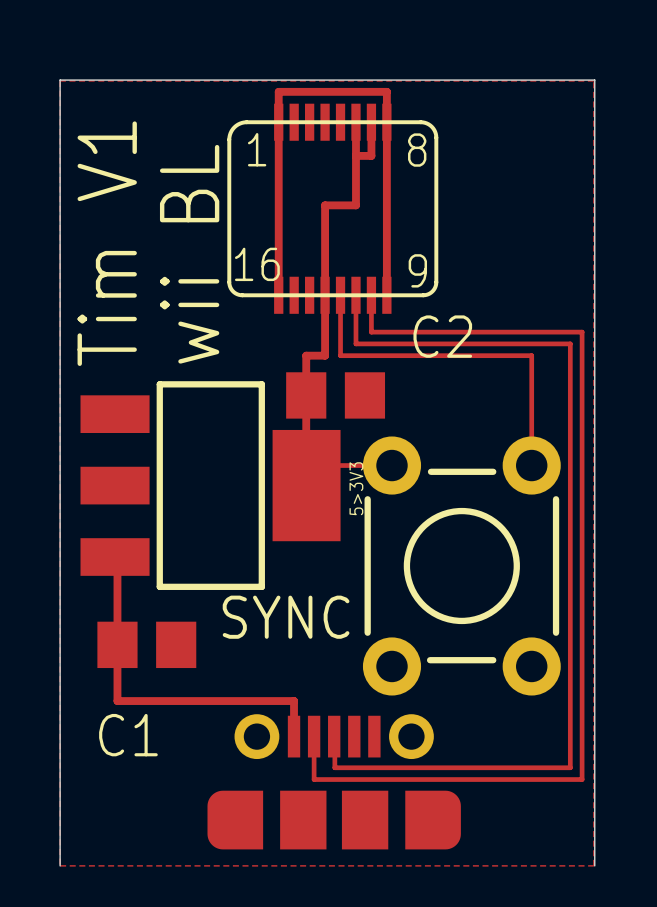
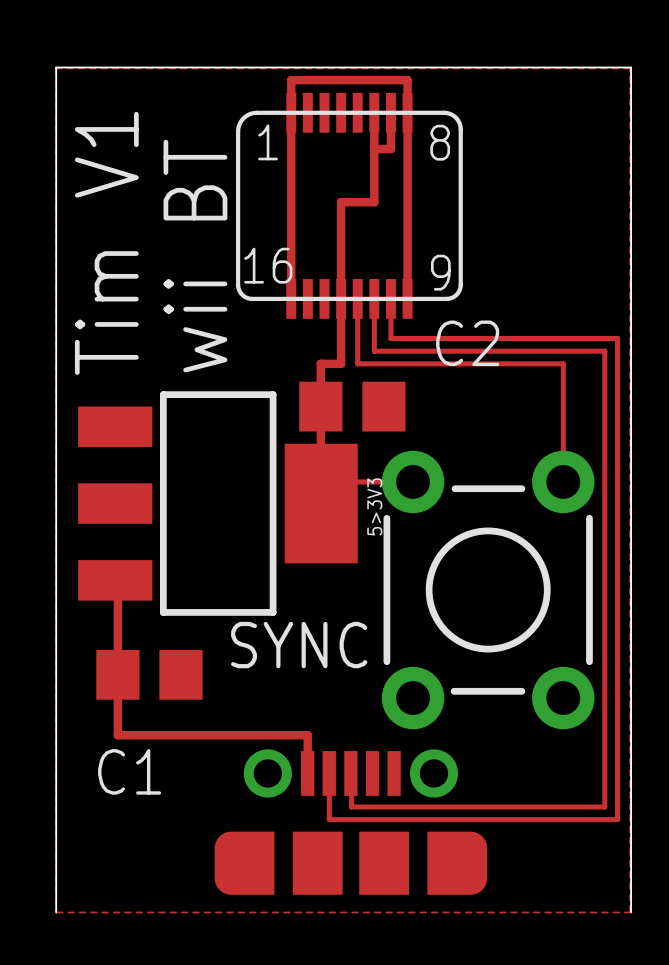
text: wii BL (189, 254) -> wii BT (195, 256)

